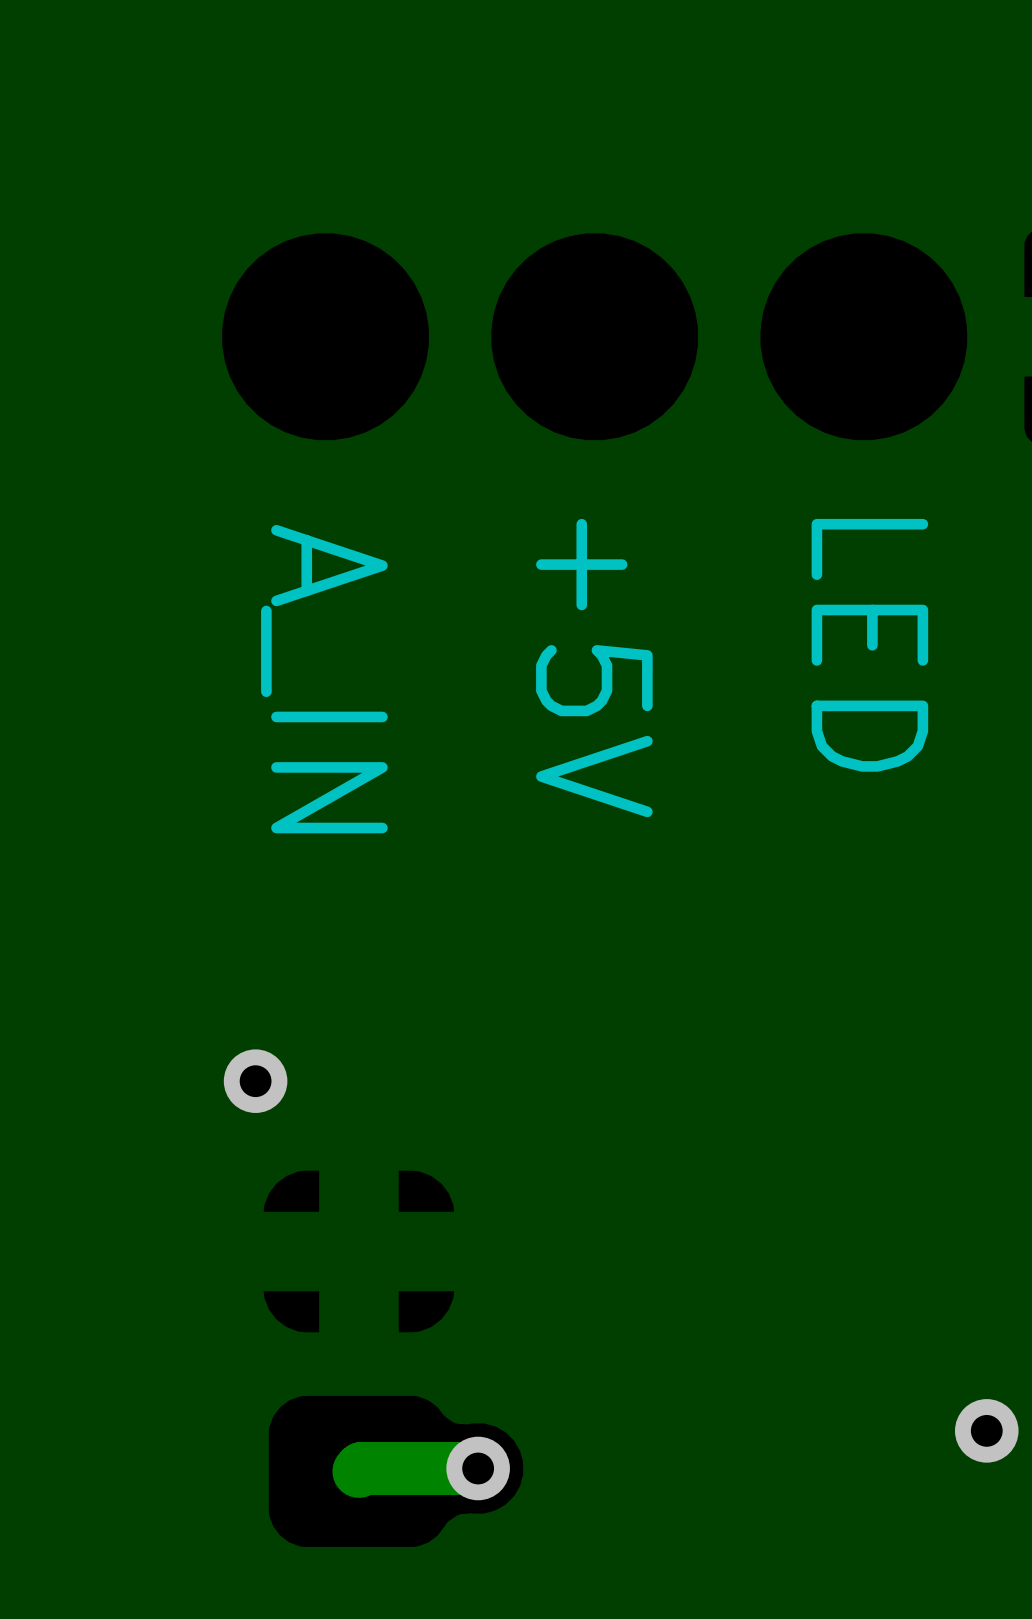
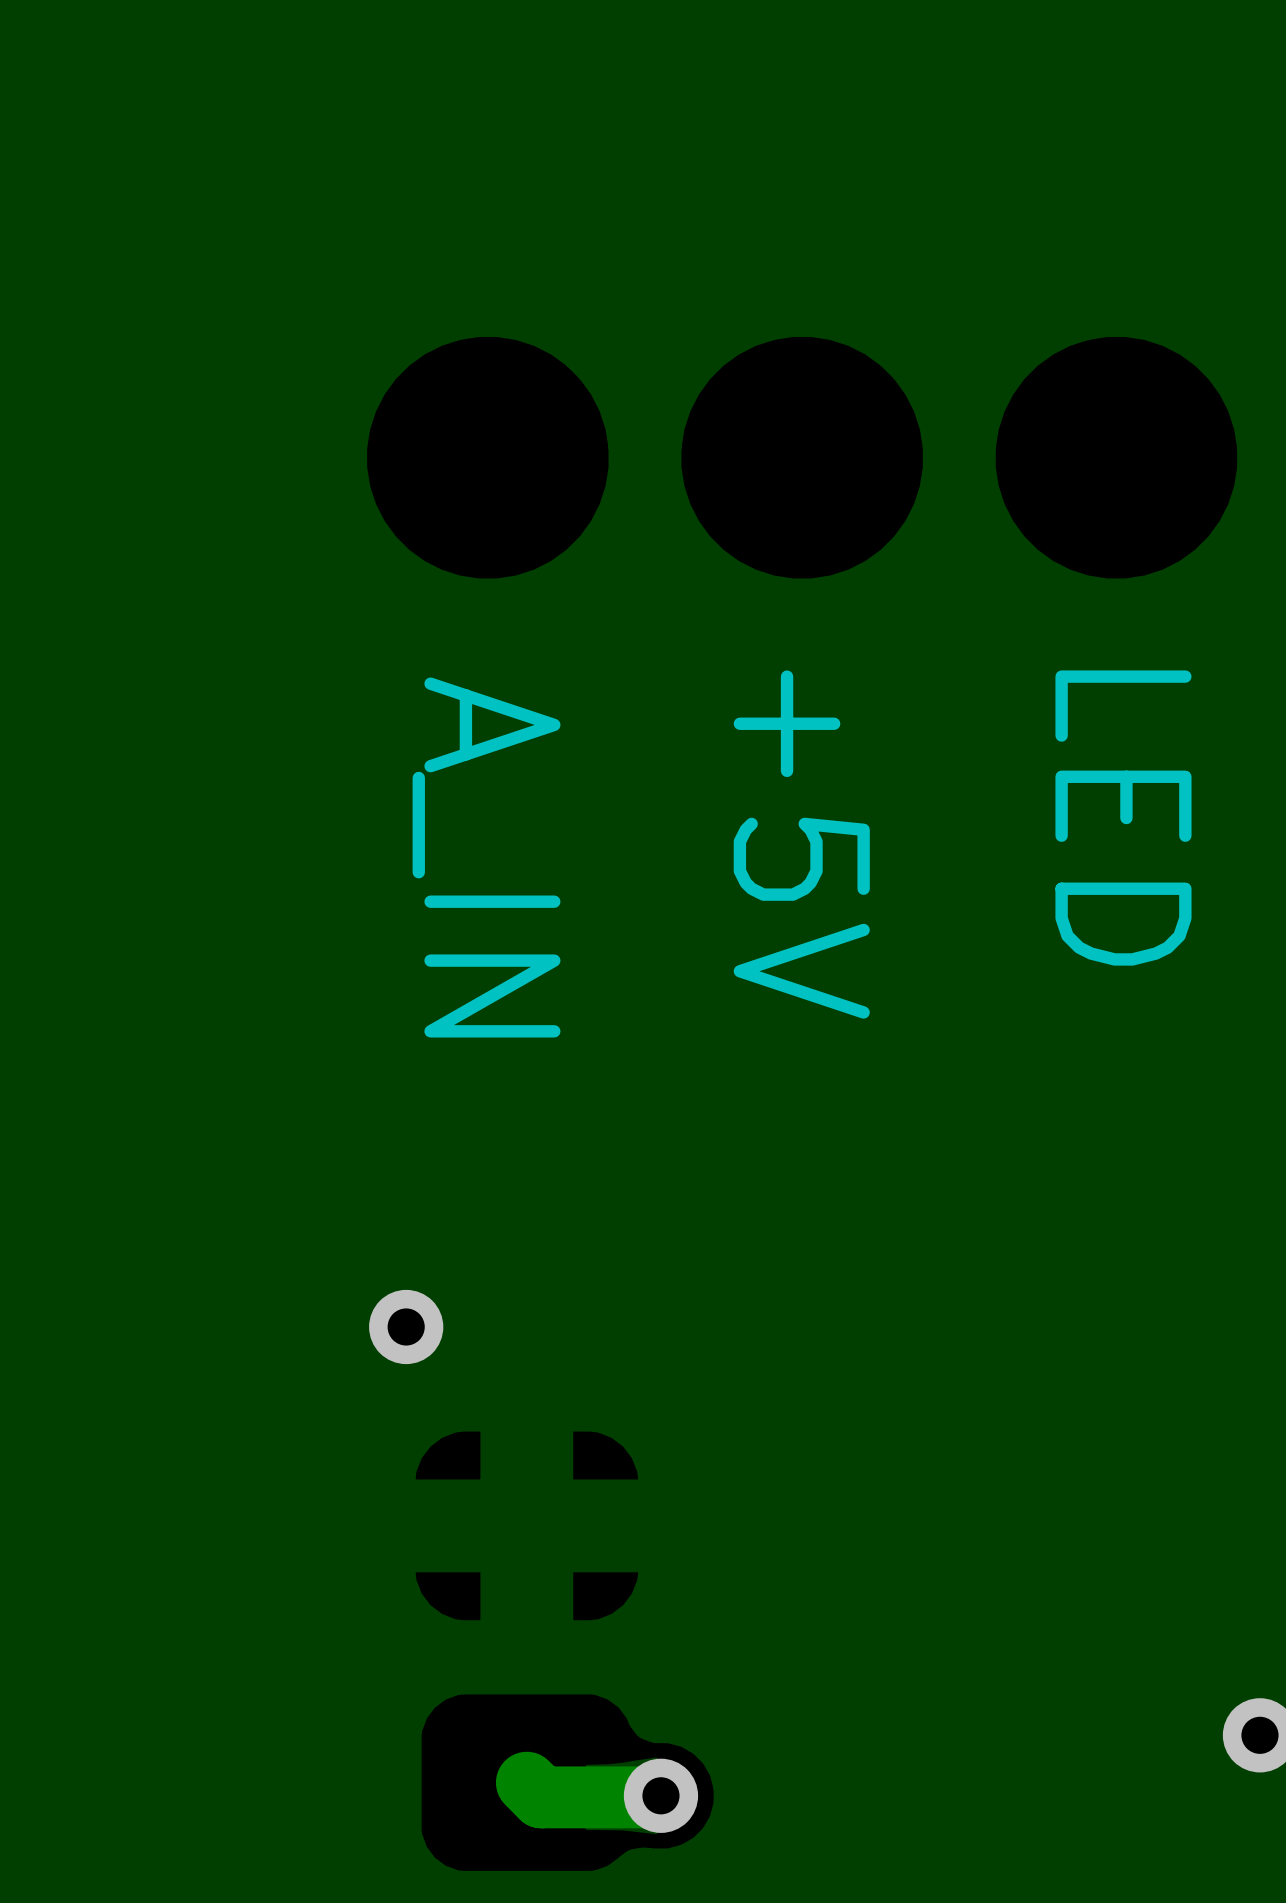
track: (478, 1468) (361, 1468) (358, 1471) -> (659, 1797) (541, 1797) (526, 1782)
via position: (478, 1468) -> (660, 1795)

